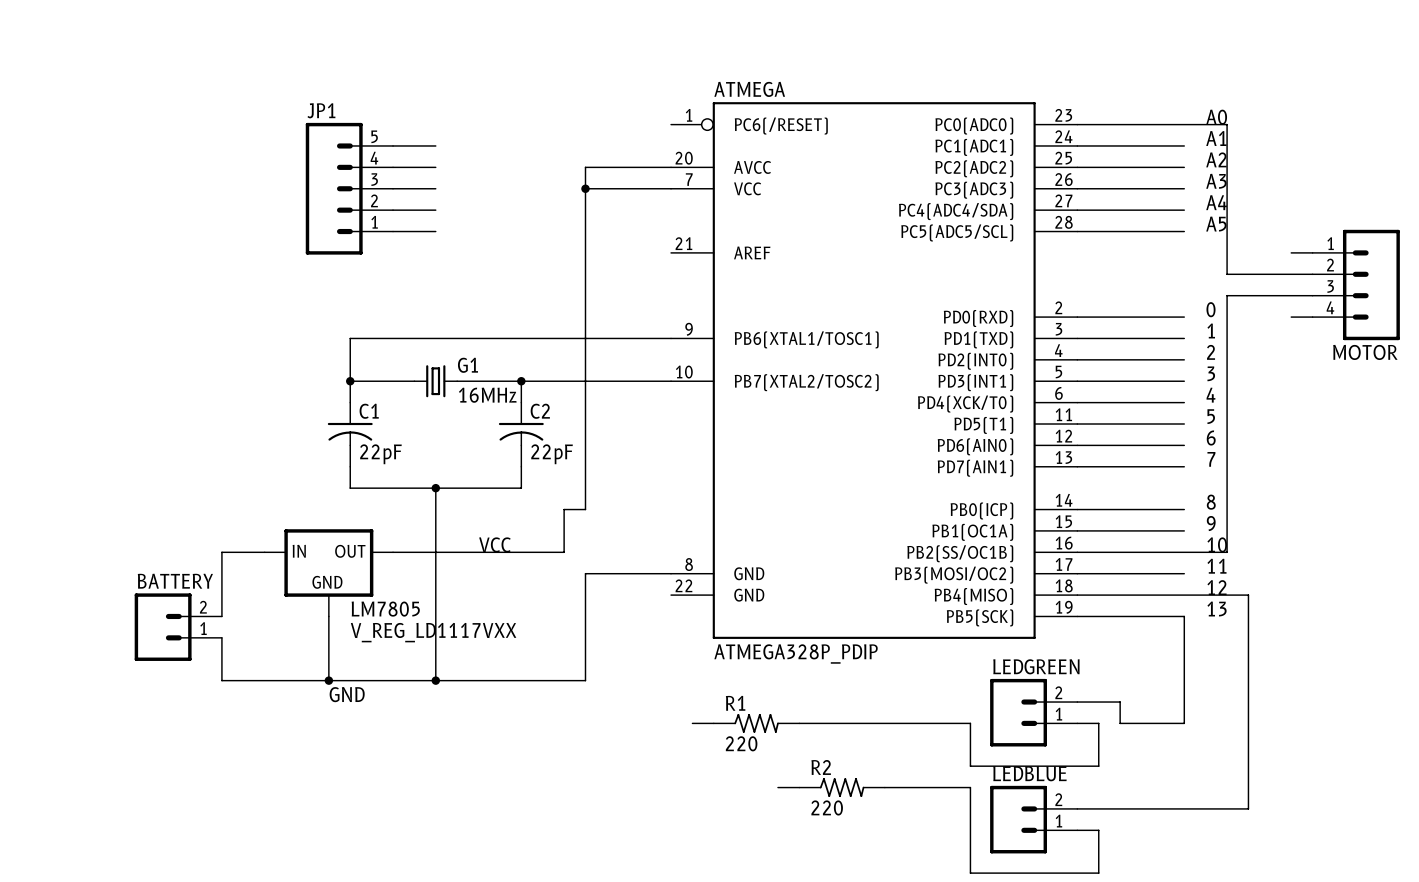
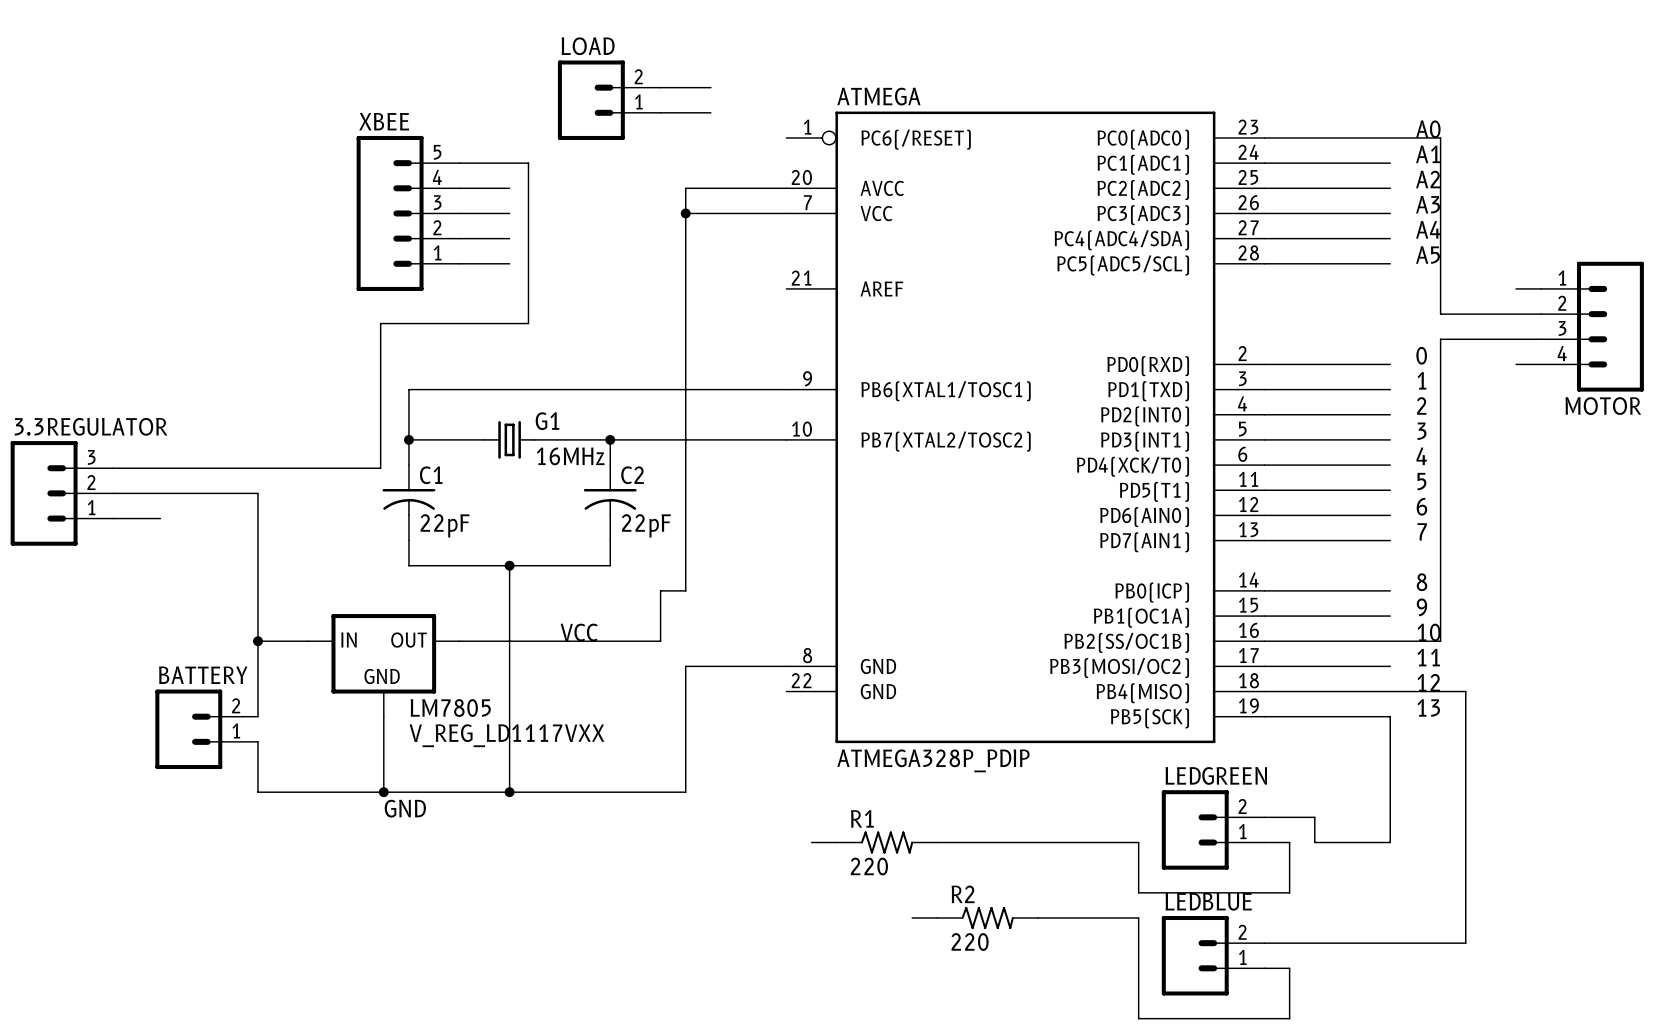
wire: none -> (660, 87) (710, 87)
LOAD: none -> (609, 100)
wire: none -> (660, 112) (710, 112)
JP1 name: JP1 (321, 110) -> XBEE (384, 121)
wire: none -> (509, 163) (528, 163) (528, 323) (380, 323) (380, 468) (113, 468)
3.3REGULATOR: none -> (61, 493)
wire: none -> (113, 493) (257, 493) (257, 641)
wire: none -> (113, 518) (160, 518)
junction: none -> (257, 641)

